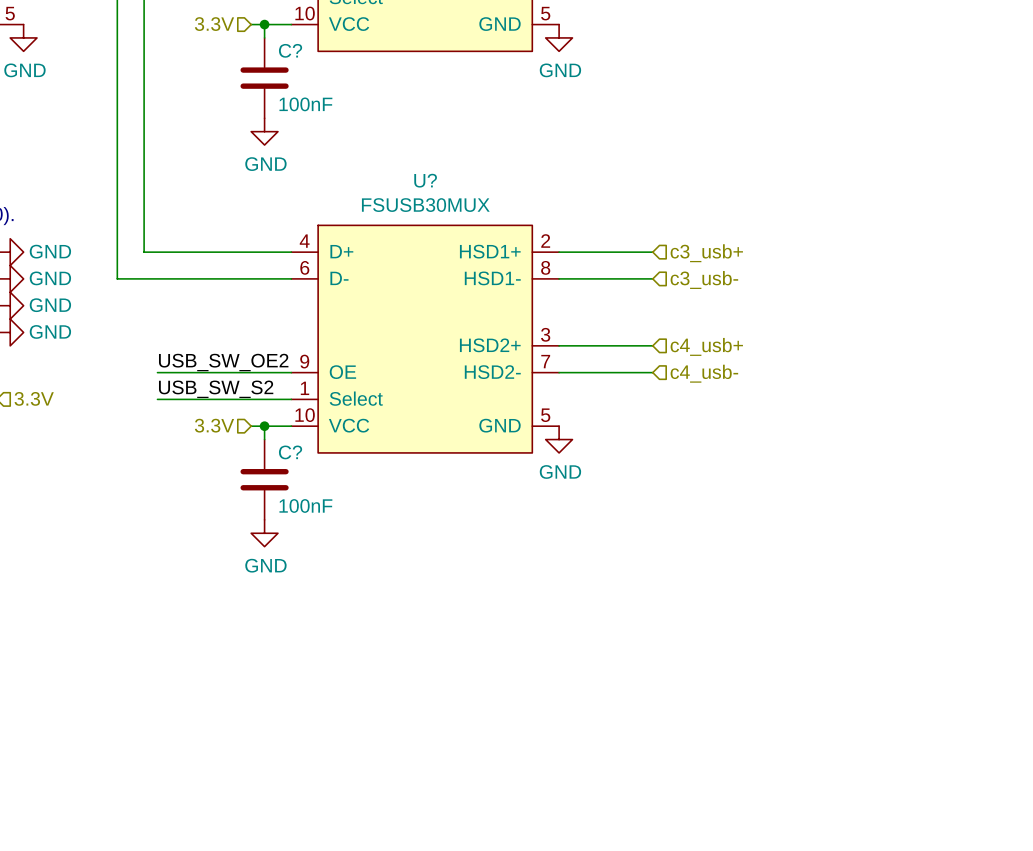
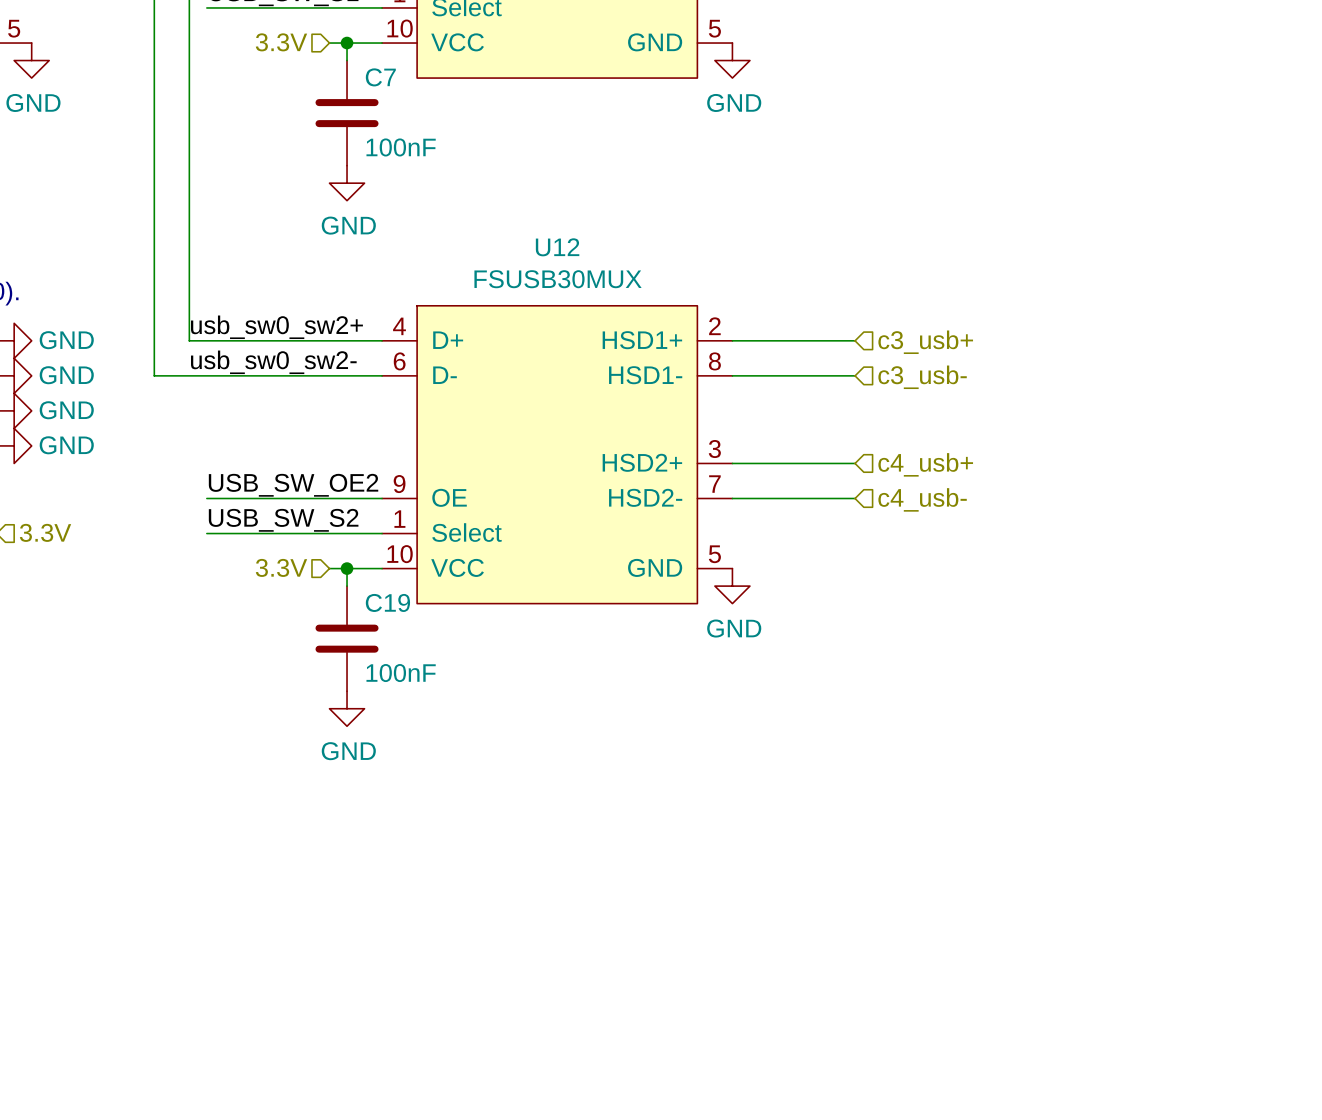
C? name: C? (290, 50) -> C7 (380, 77)
U? name: U? (425, 180) -> U12 (557, 247)
label: none -> usb_sw0_sw2+ (276, 327)
label: none -> usb_sw0_sw2- (273, 362)
C? name: C? (290, 452) -> C19 (387, 602)

